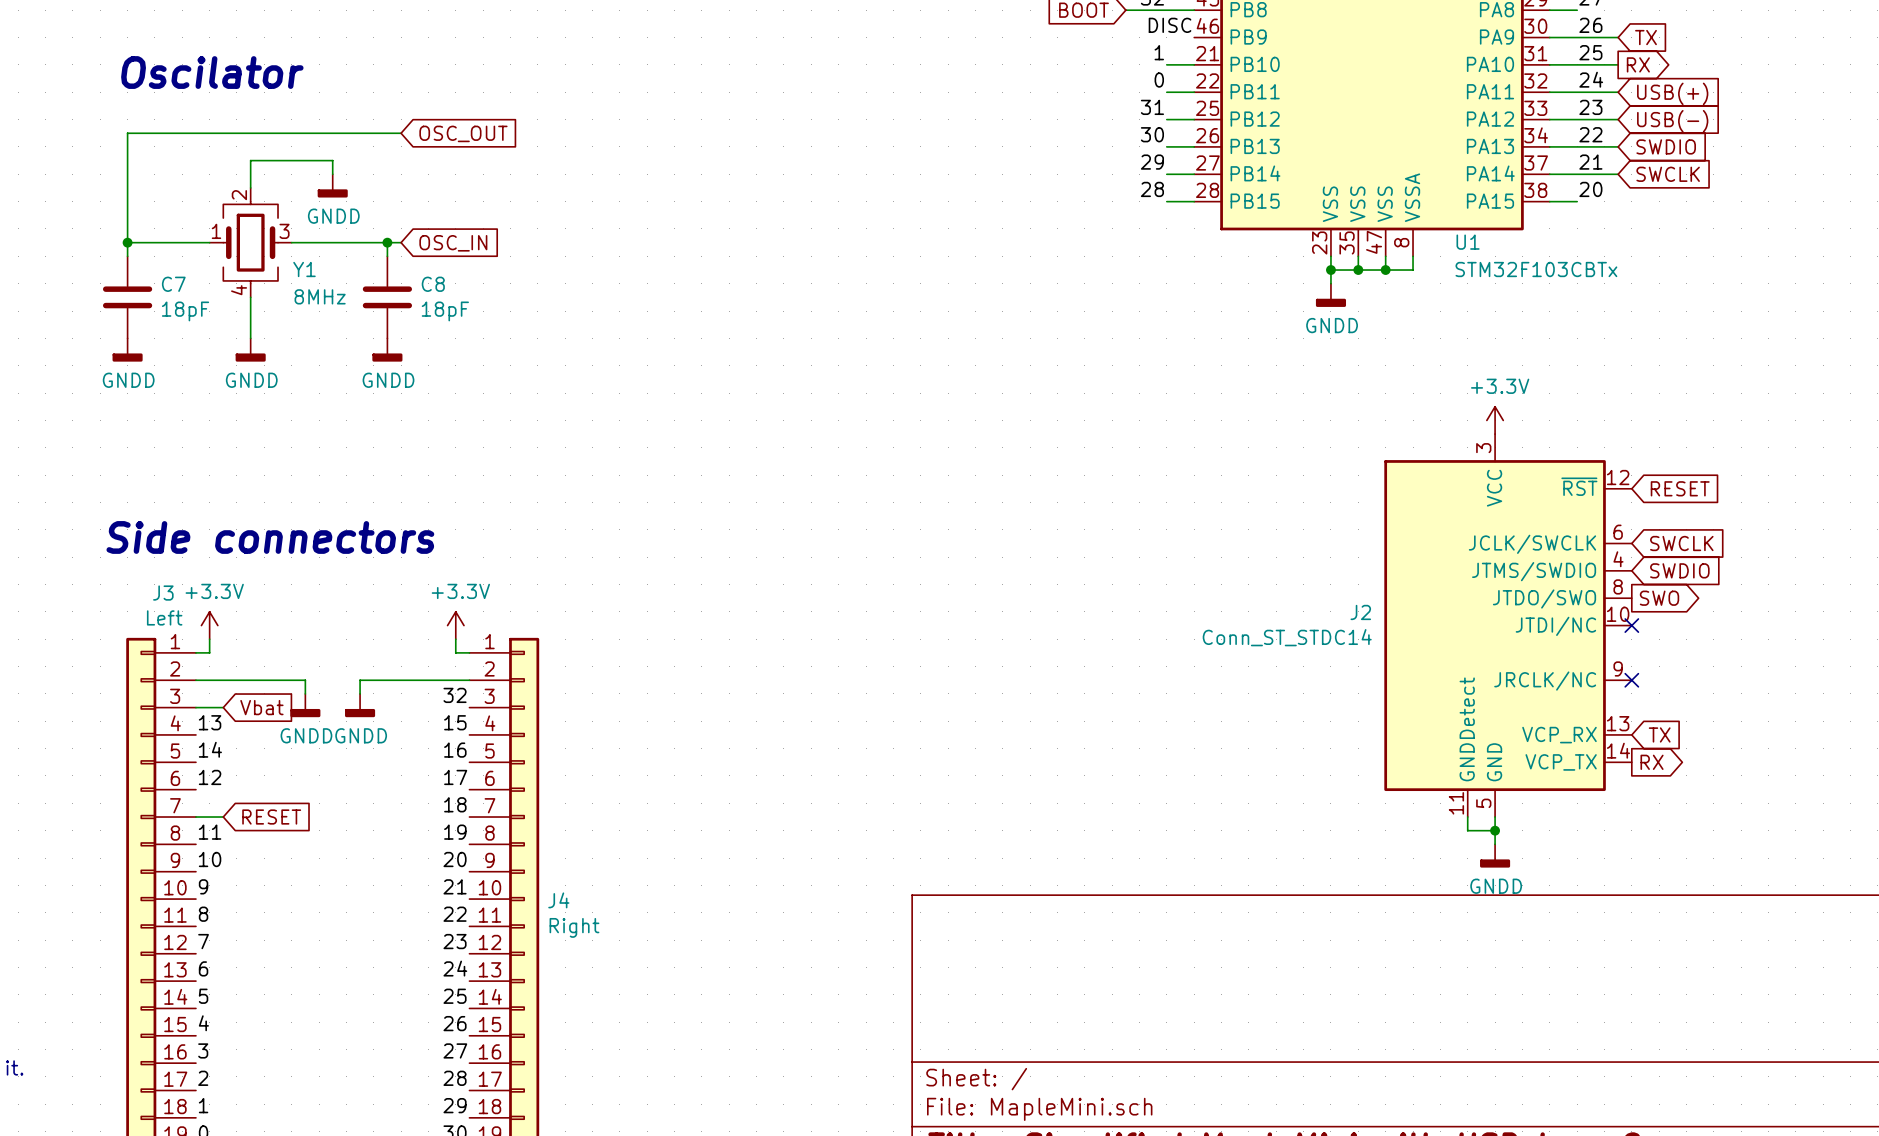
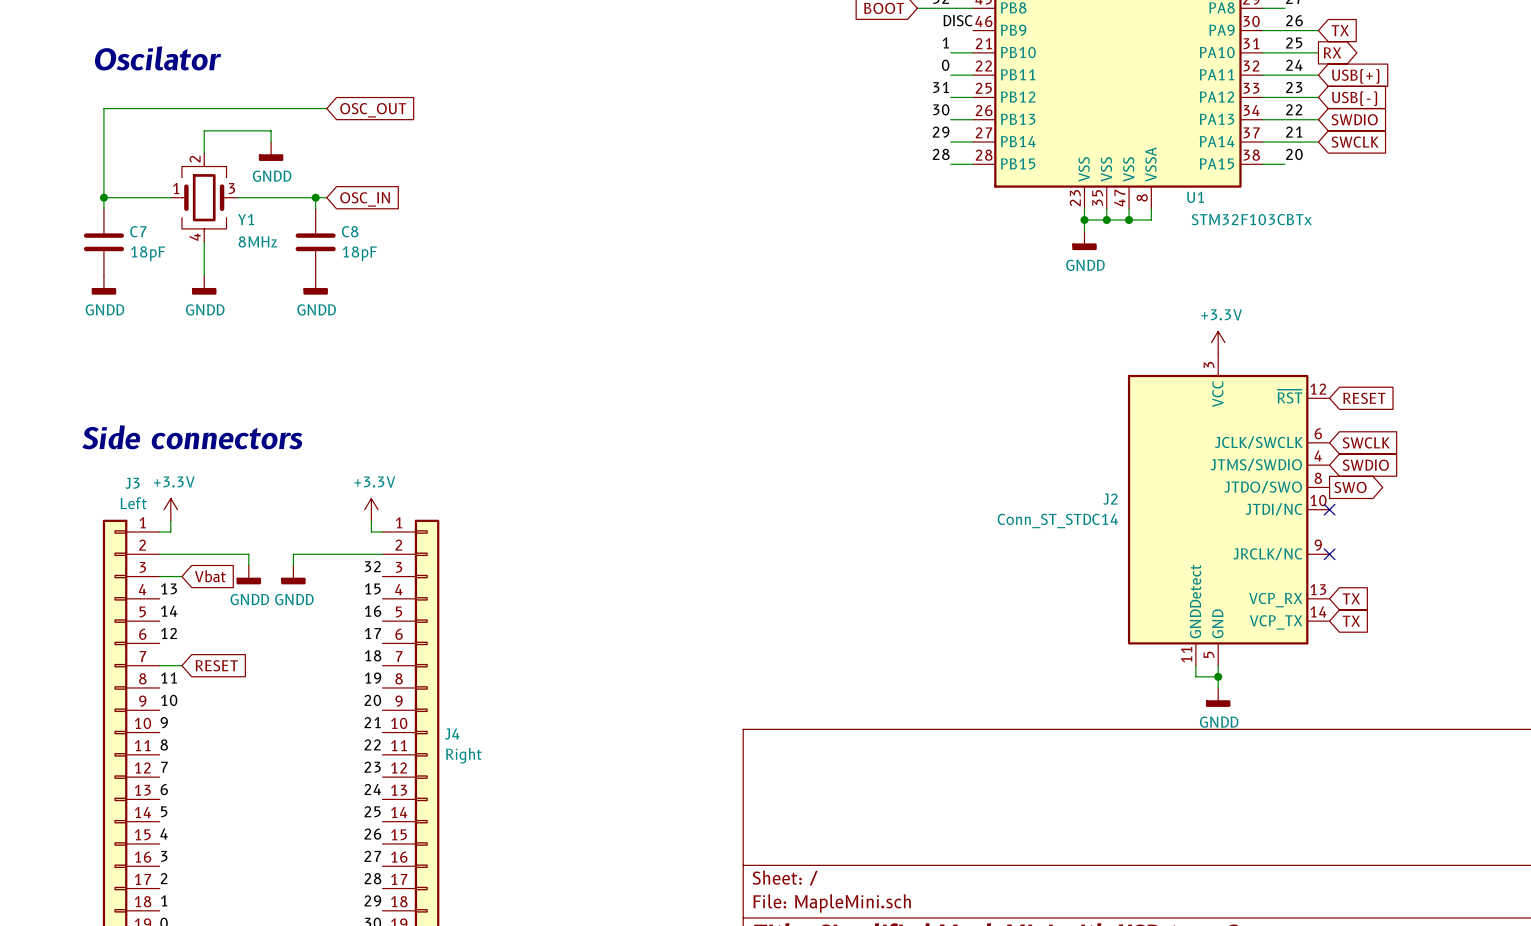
global label shape: output (1652, 762) -> input (1351, 621)
global label: RX (1652, 762) -> TX (1351, 621)

